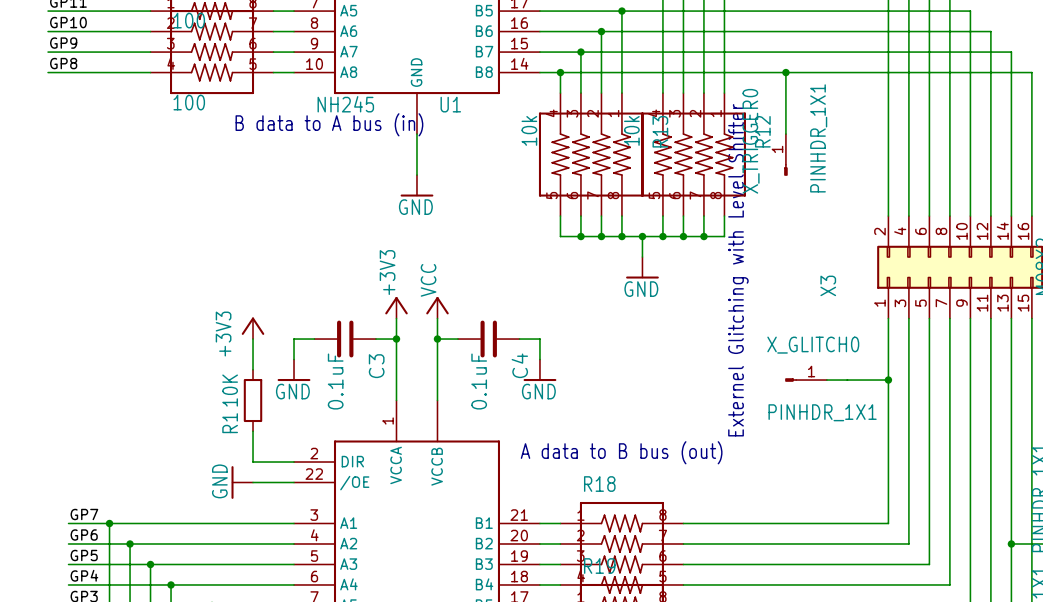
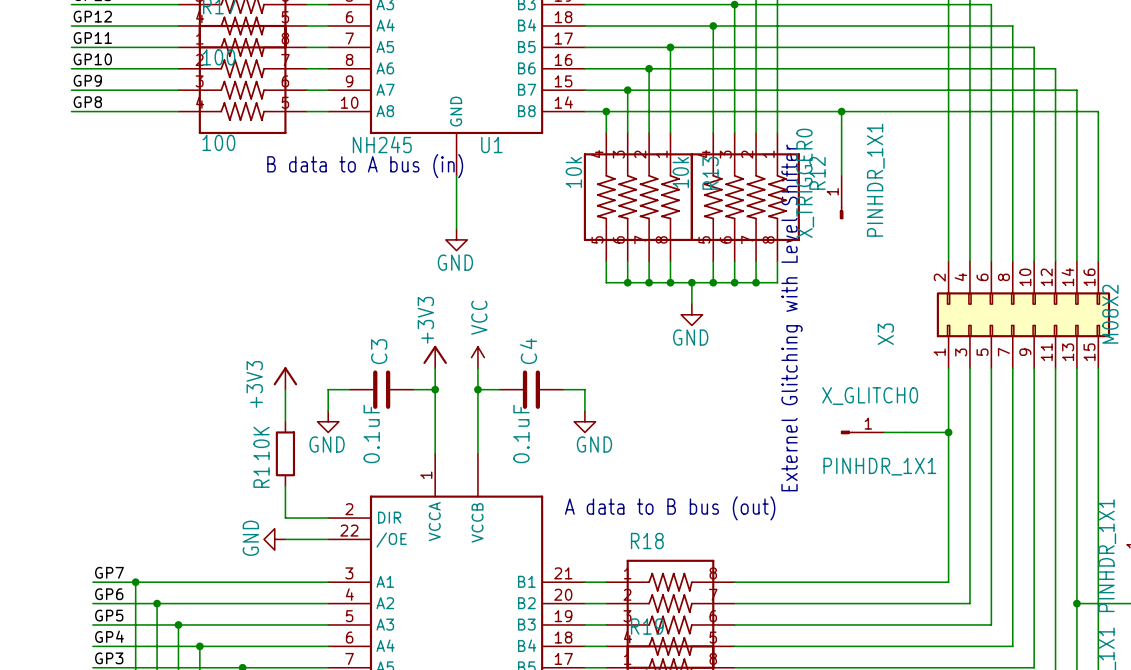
power symbol: GND (416, 185) -> none
power symbol: none -> GND (456, 239)
power symbol shape: [626, 257, 659, 279] -> [681, 304, 703, 326]
power symbol shape: [426, 297, 449, 319] -> [471, 346, 485, 369]
power symbol shape: [277, 359, 311, 382] -> [317, 411, 339, 433]
power symbol shape: [523, 359, 557, 382] -> [574, 411, 596, 433]
C4 name position: C4 (519, 365) -> C4 (528, 351)
C3 name position: C3 (376, 366) -> C3 (379, 351)
power symbol shape: [231, 466, 254, 499] -> [264, 528, 286, 551]

